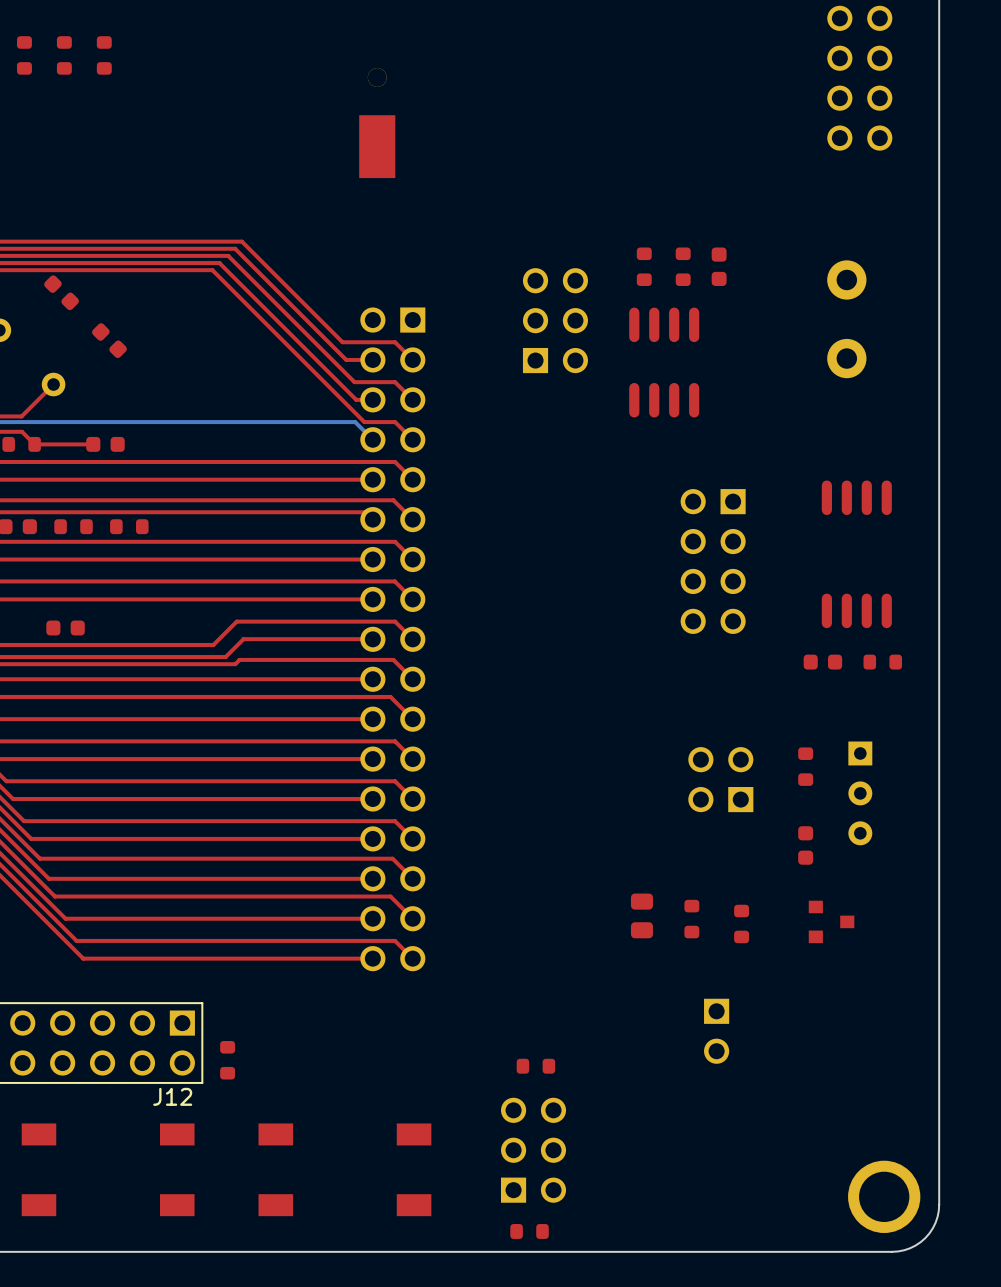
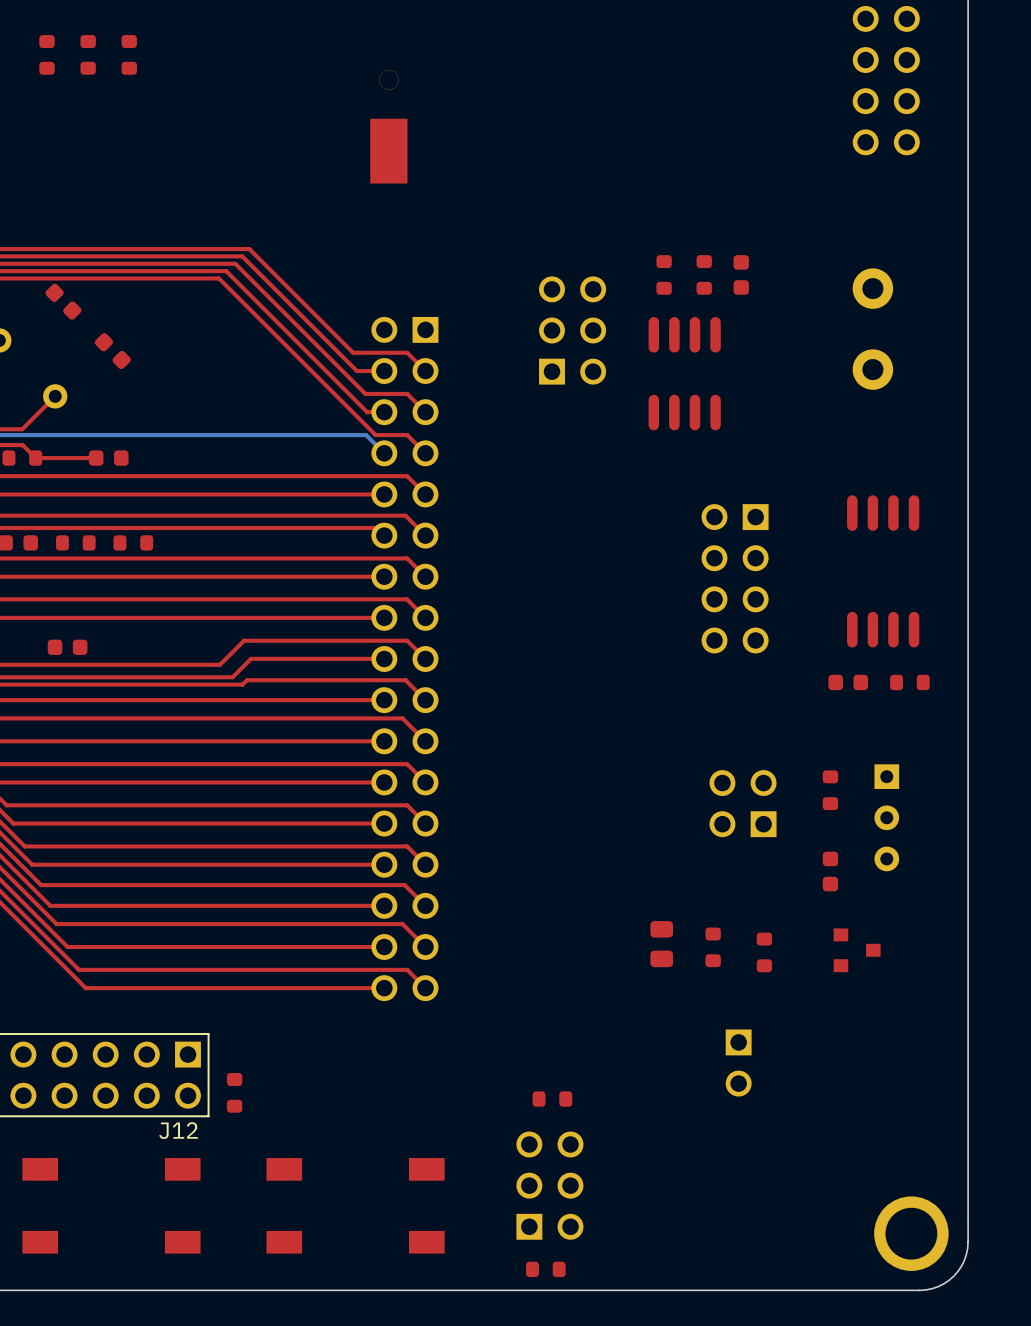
part: none -> (47, 54)
part: none -> (88, 54)
part: none -> (129, 54)
part: (24, 55) -> none
part: (64, 55) -> none
part: (104, 55) -> none

